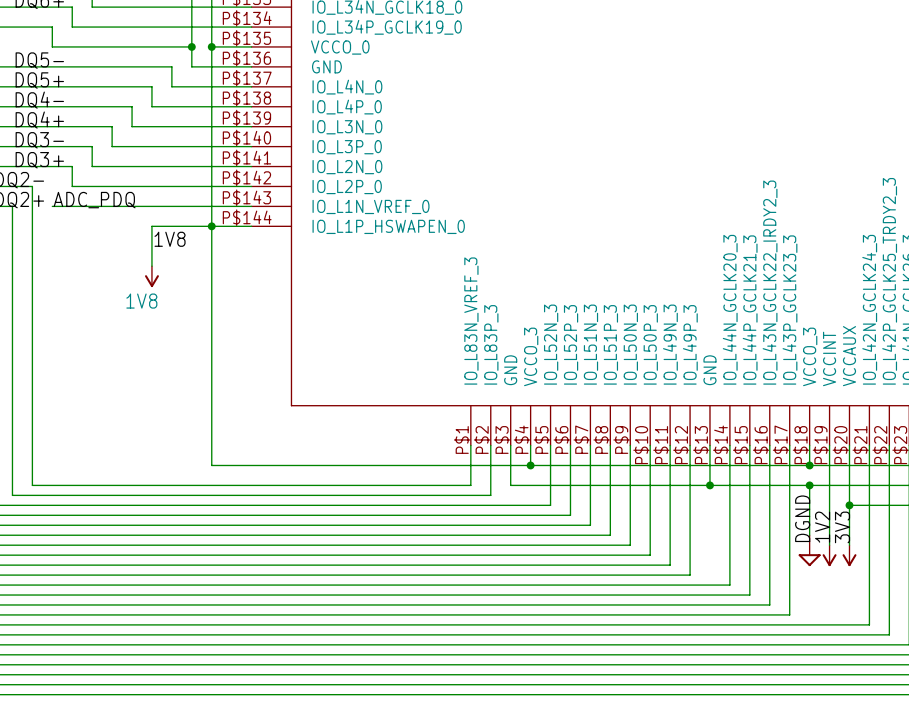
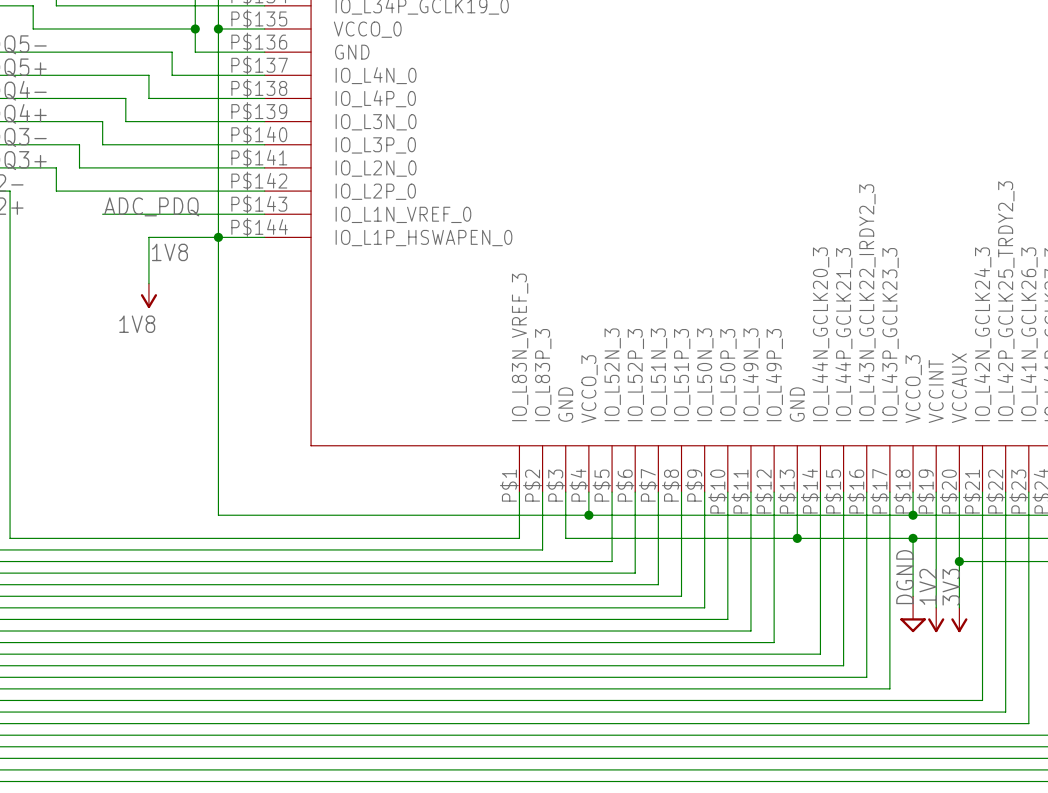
label position: ADC_PDQ (94, 200) -> ADC_PDQ (151, 206)
wire: (52, 206) (112, 206) -> none

